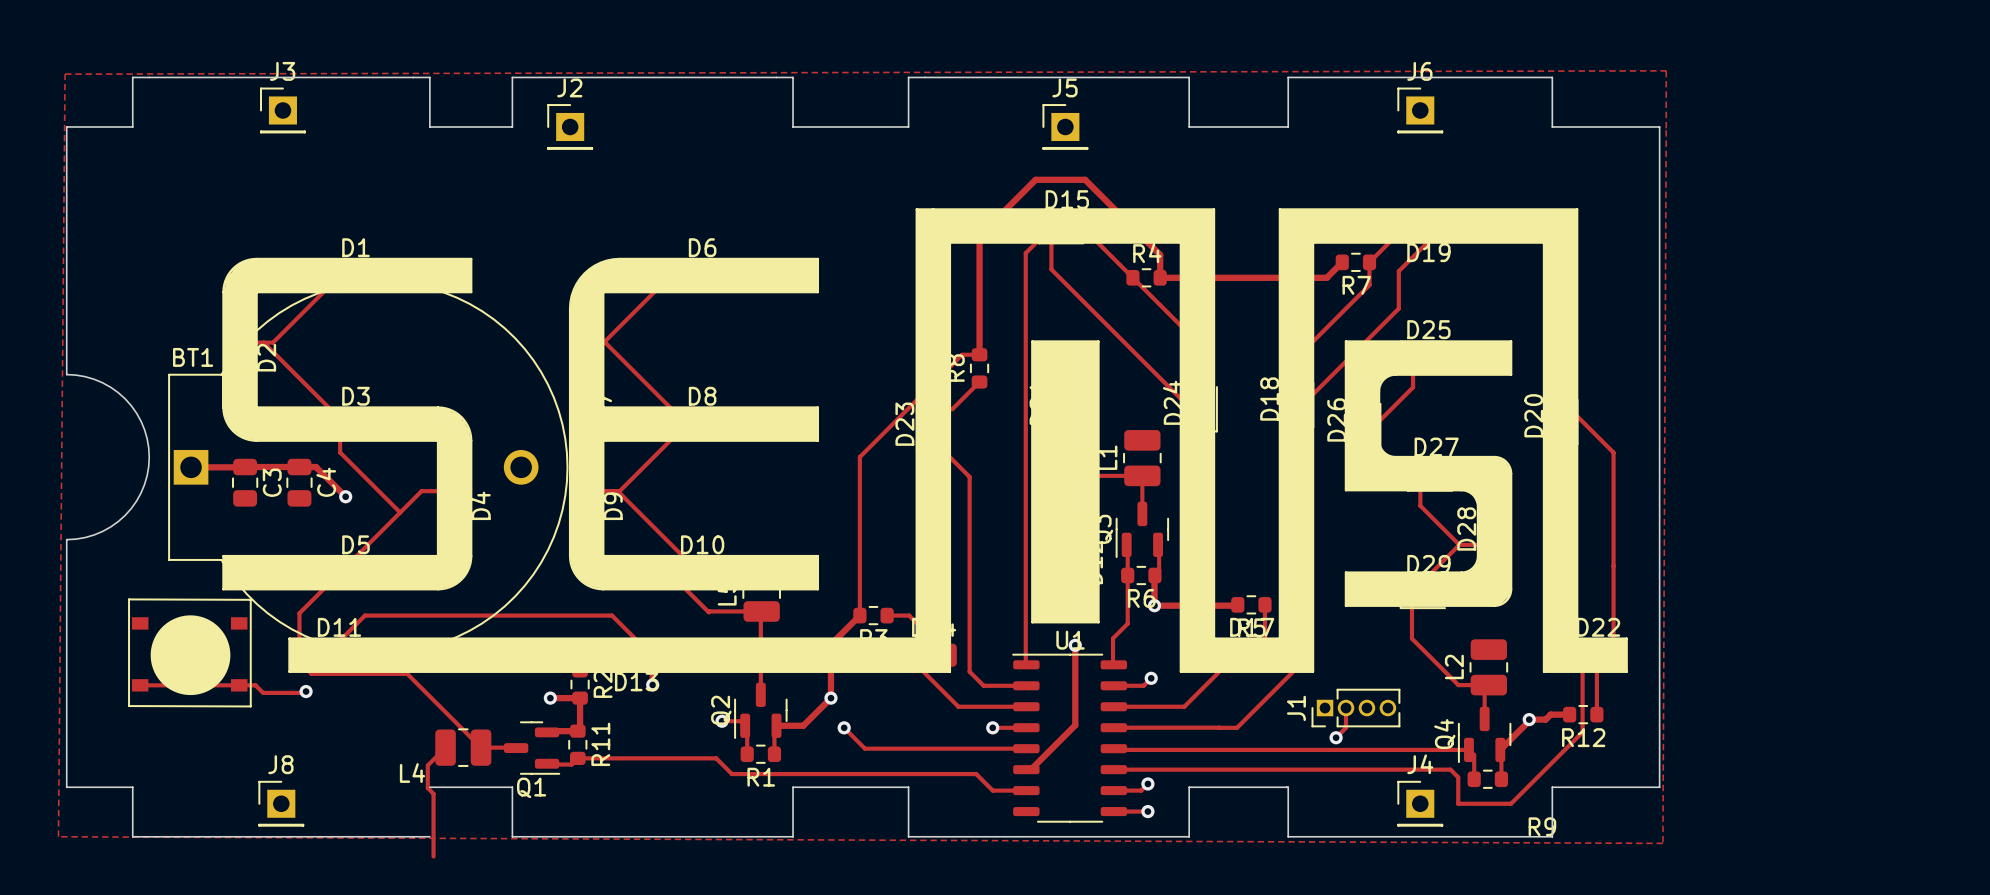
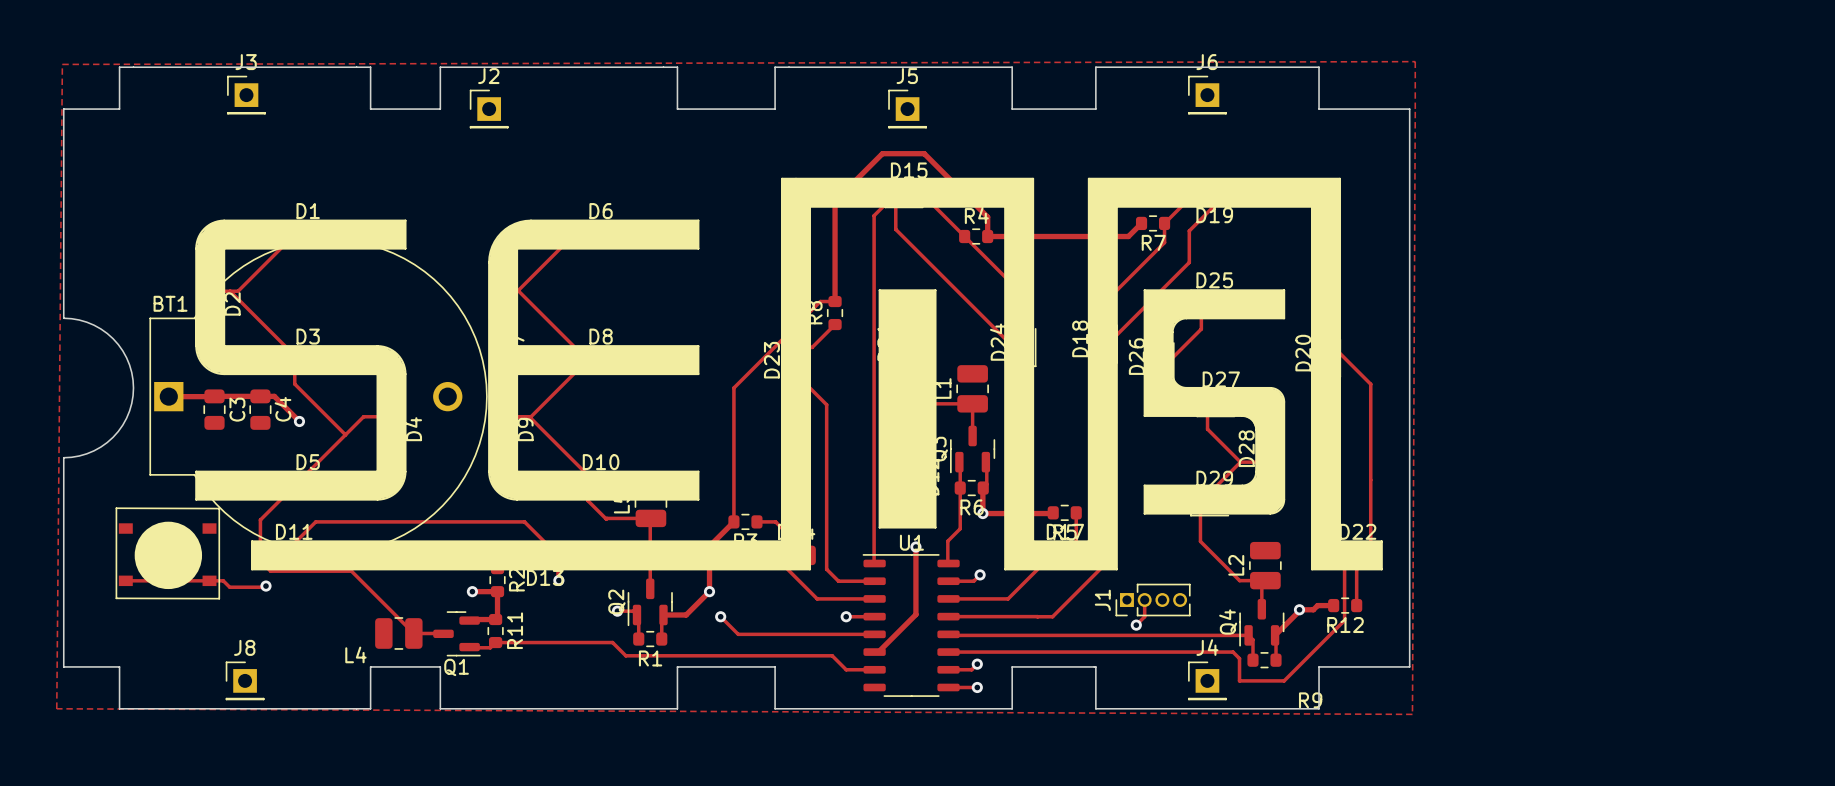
track: (445, 747) (427, 765) (427, 788) (433, 793) (433, 856) -> none
board edge: none -> (370, 666) (370, 708)

